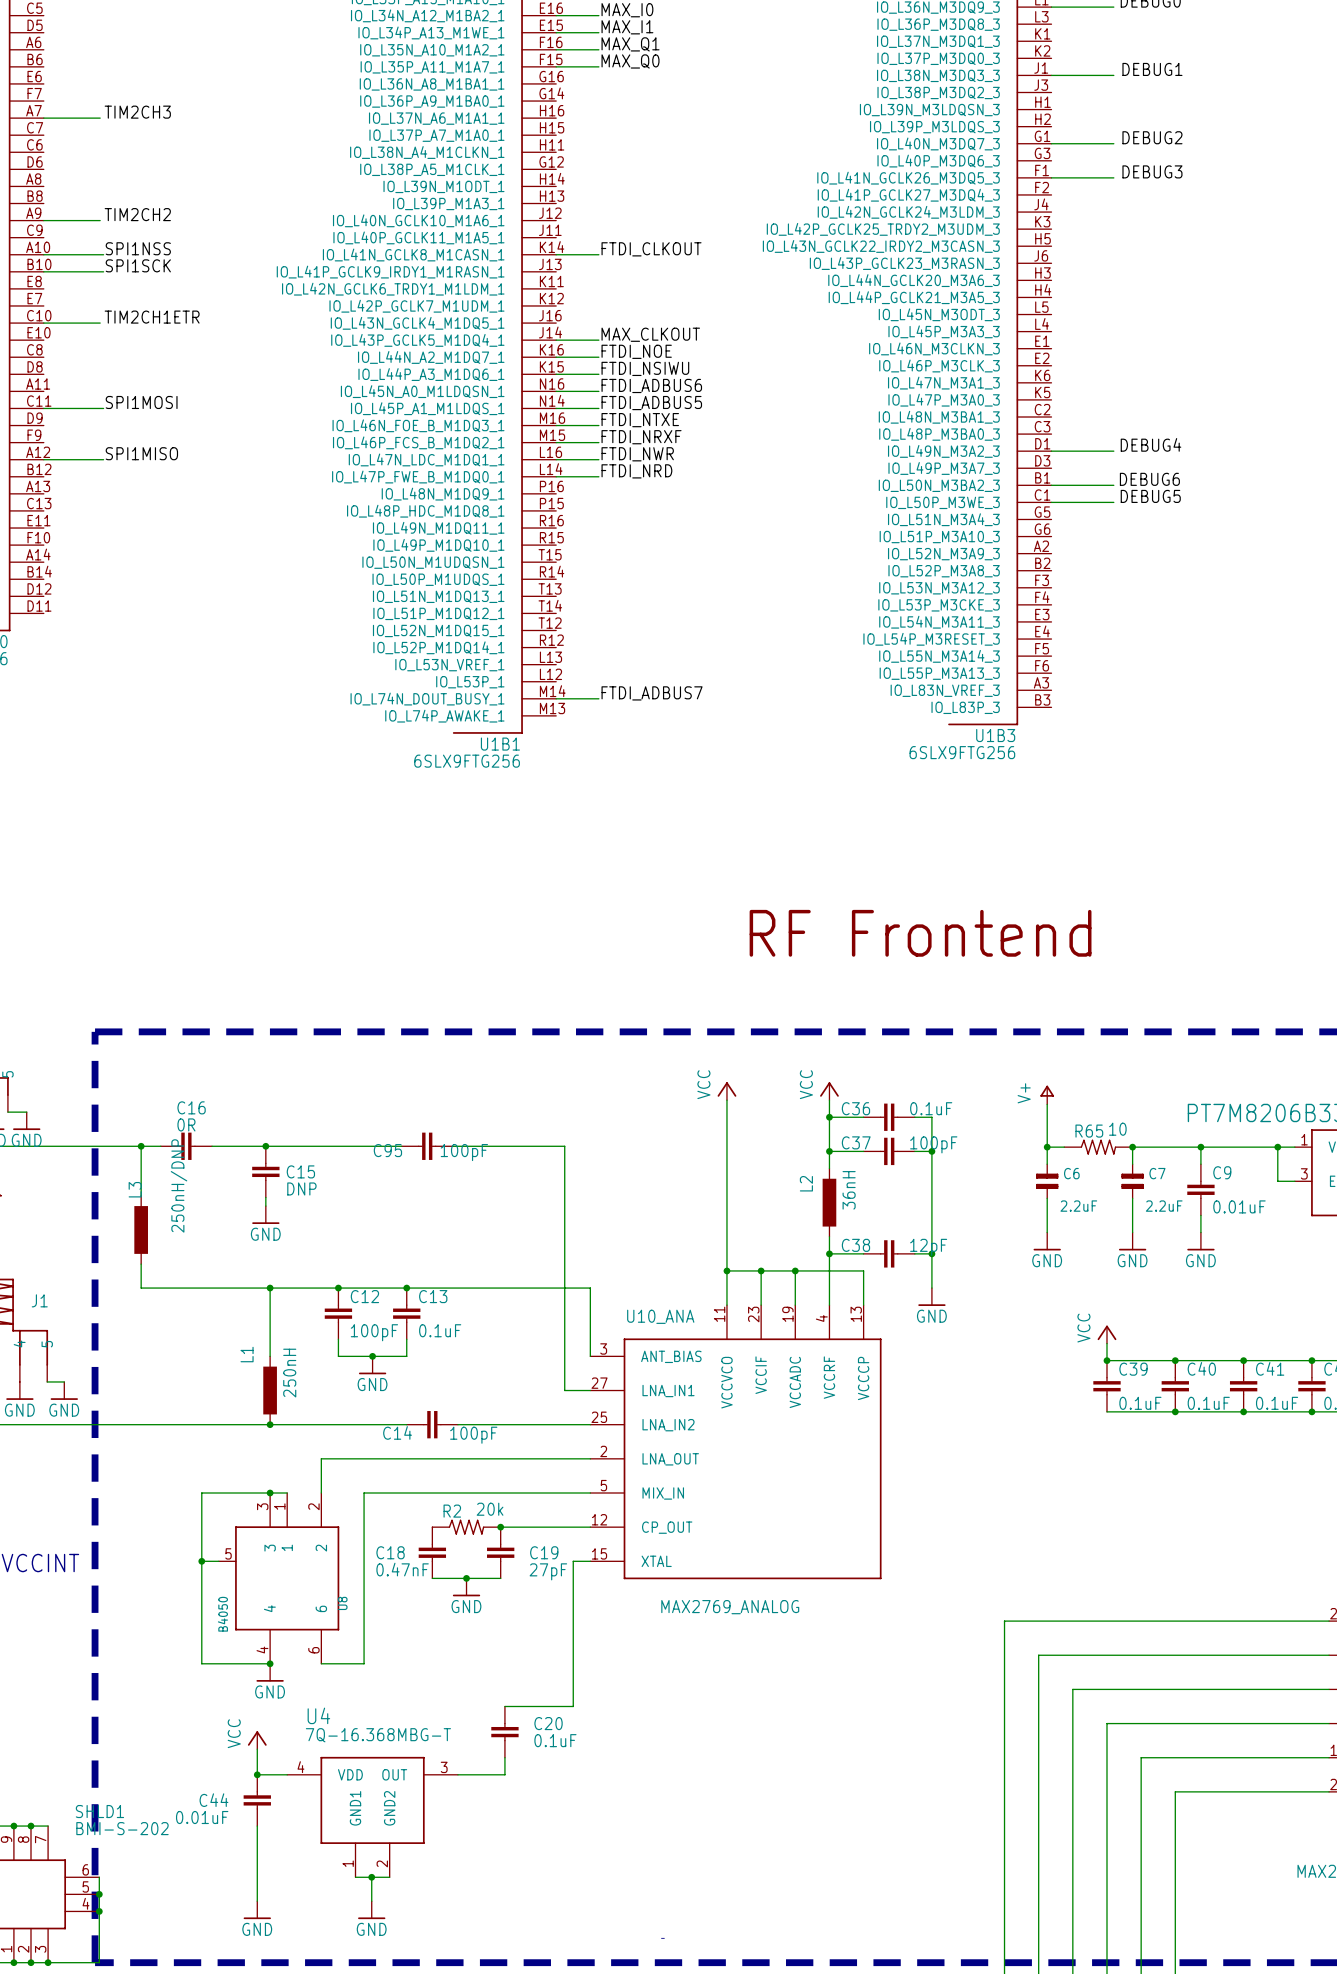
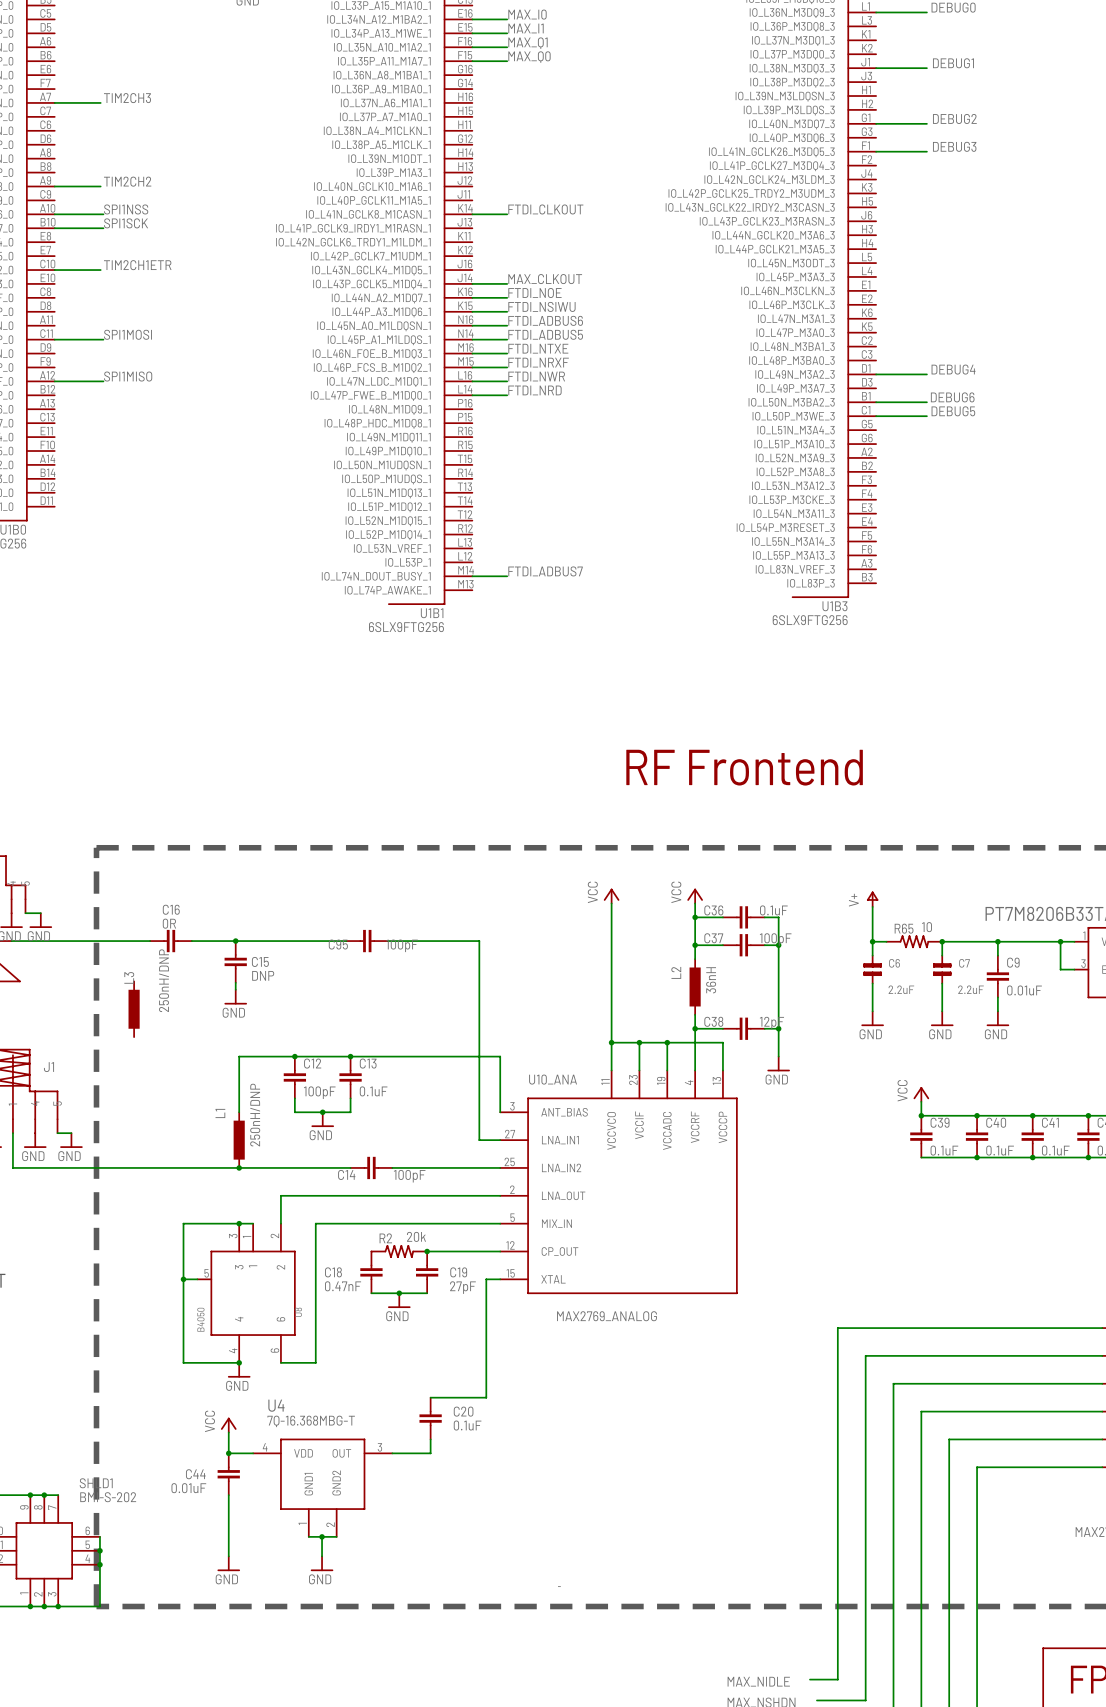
wire: (141, 1146) (141, 1195) -> none
junction: (141, 1146) -> none
wire: (141, 1264) (141, 1288) (270, 1288) -> none
junction: (270, 1288) -> none
L1 value: 250nH (289, 1373) -> 250nH/DNP (255, 1115)

